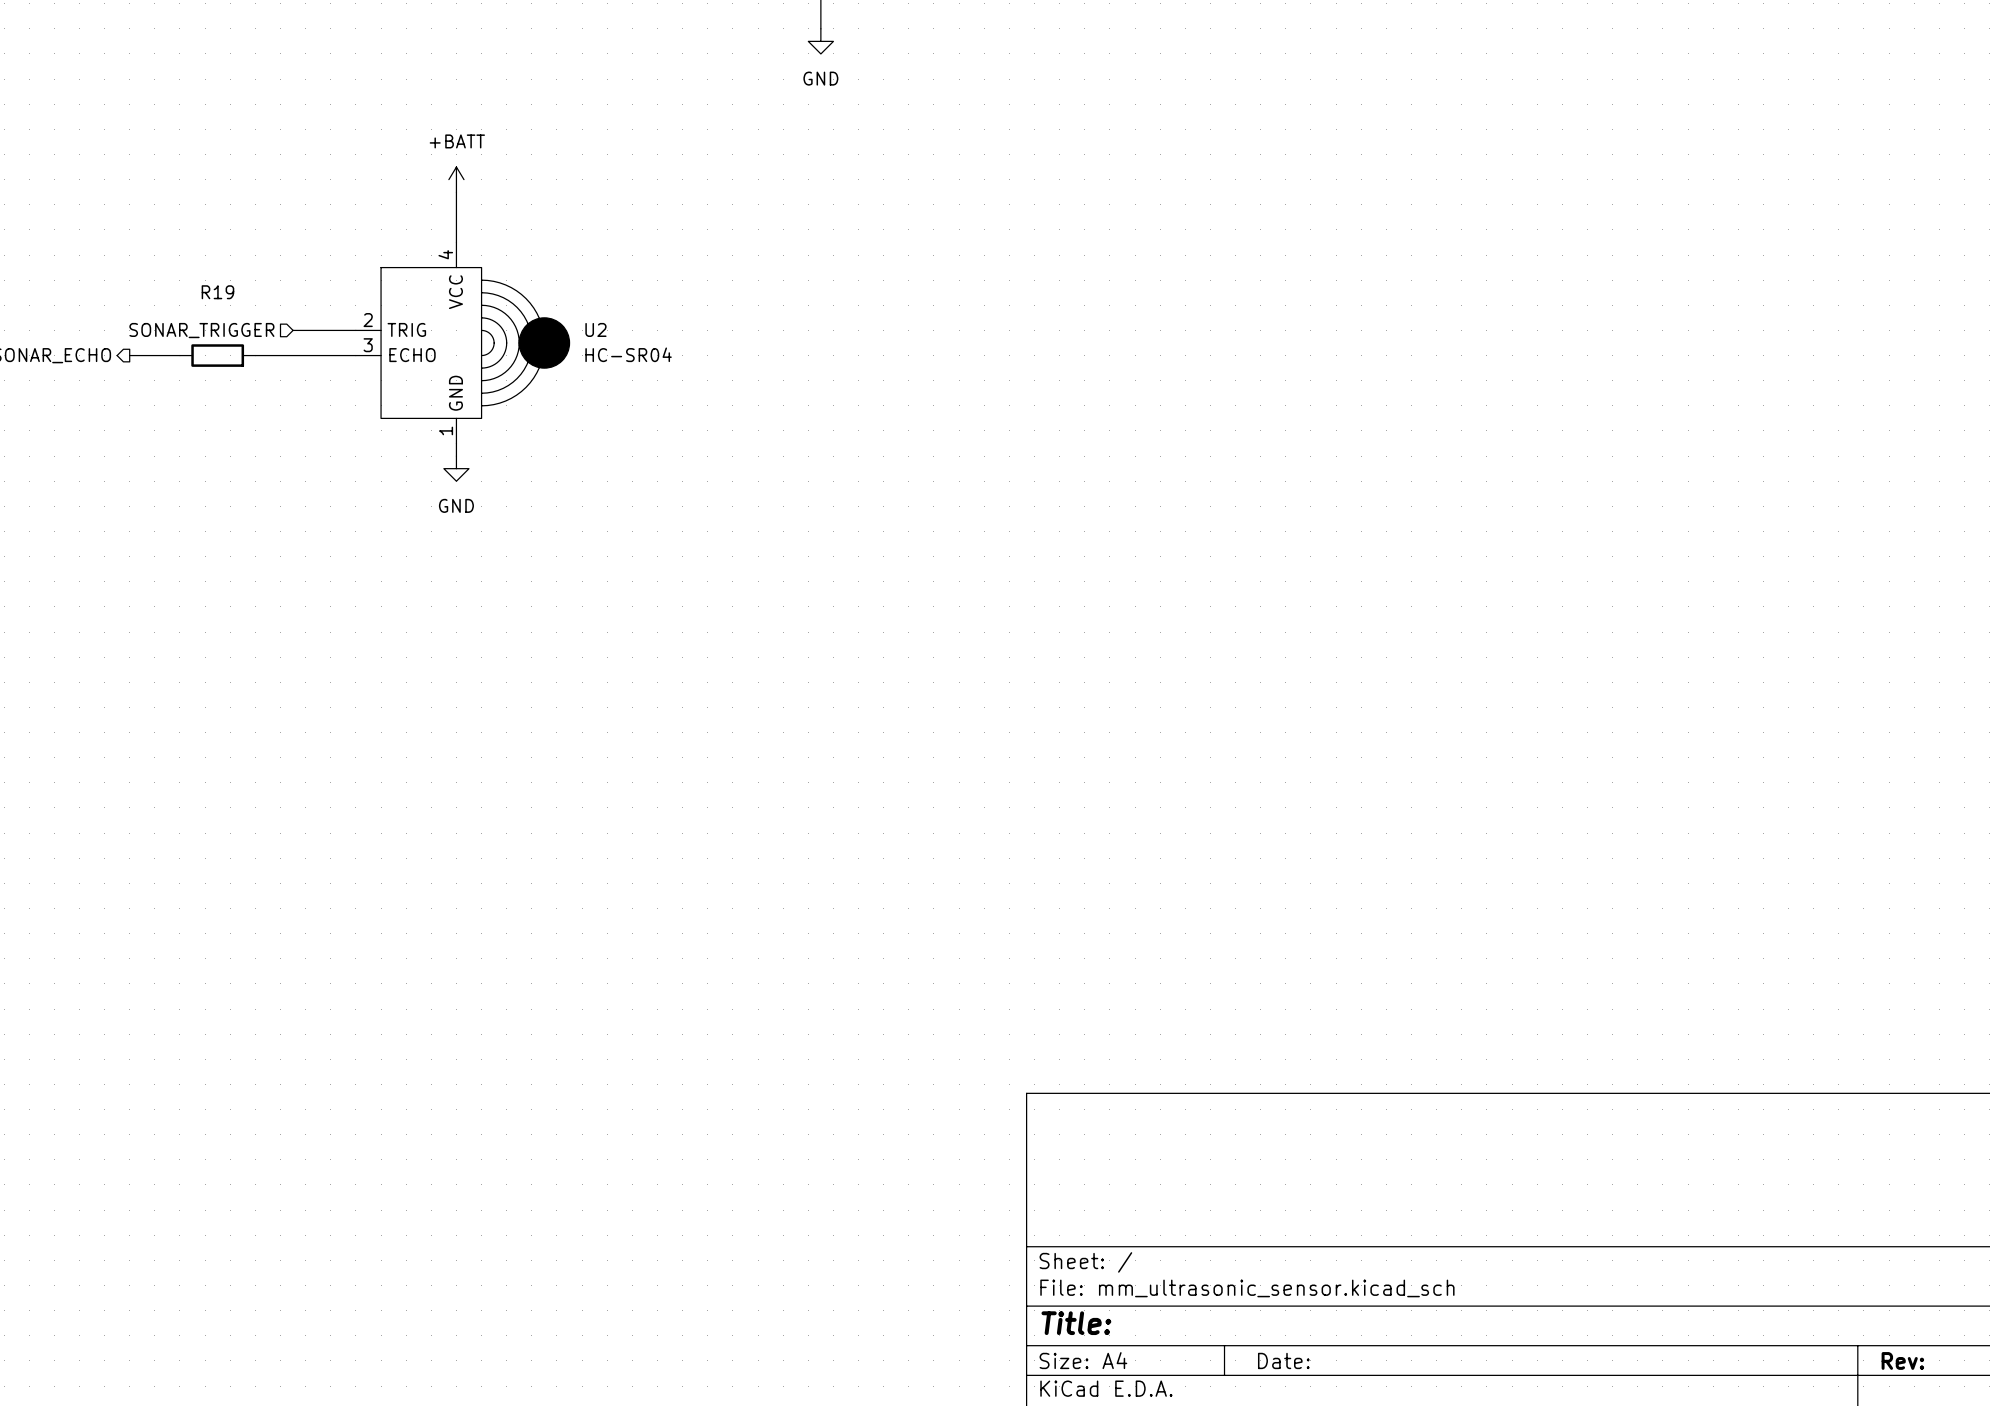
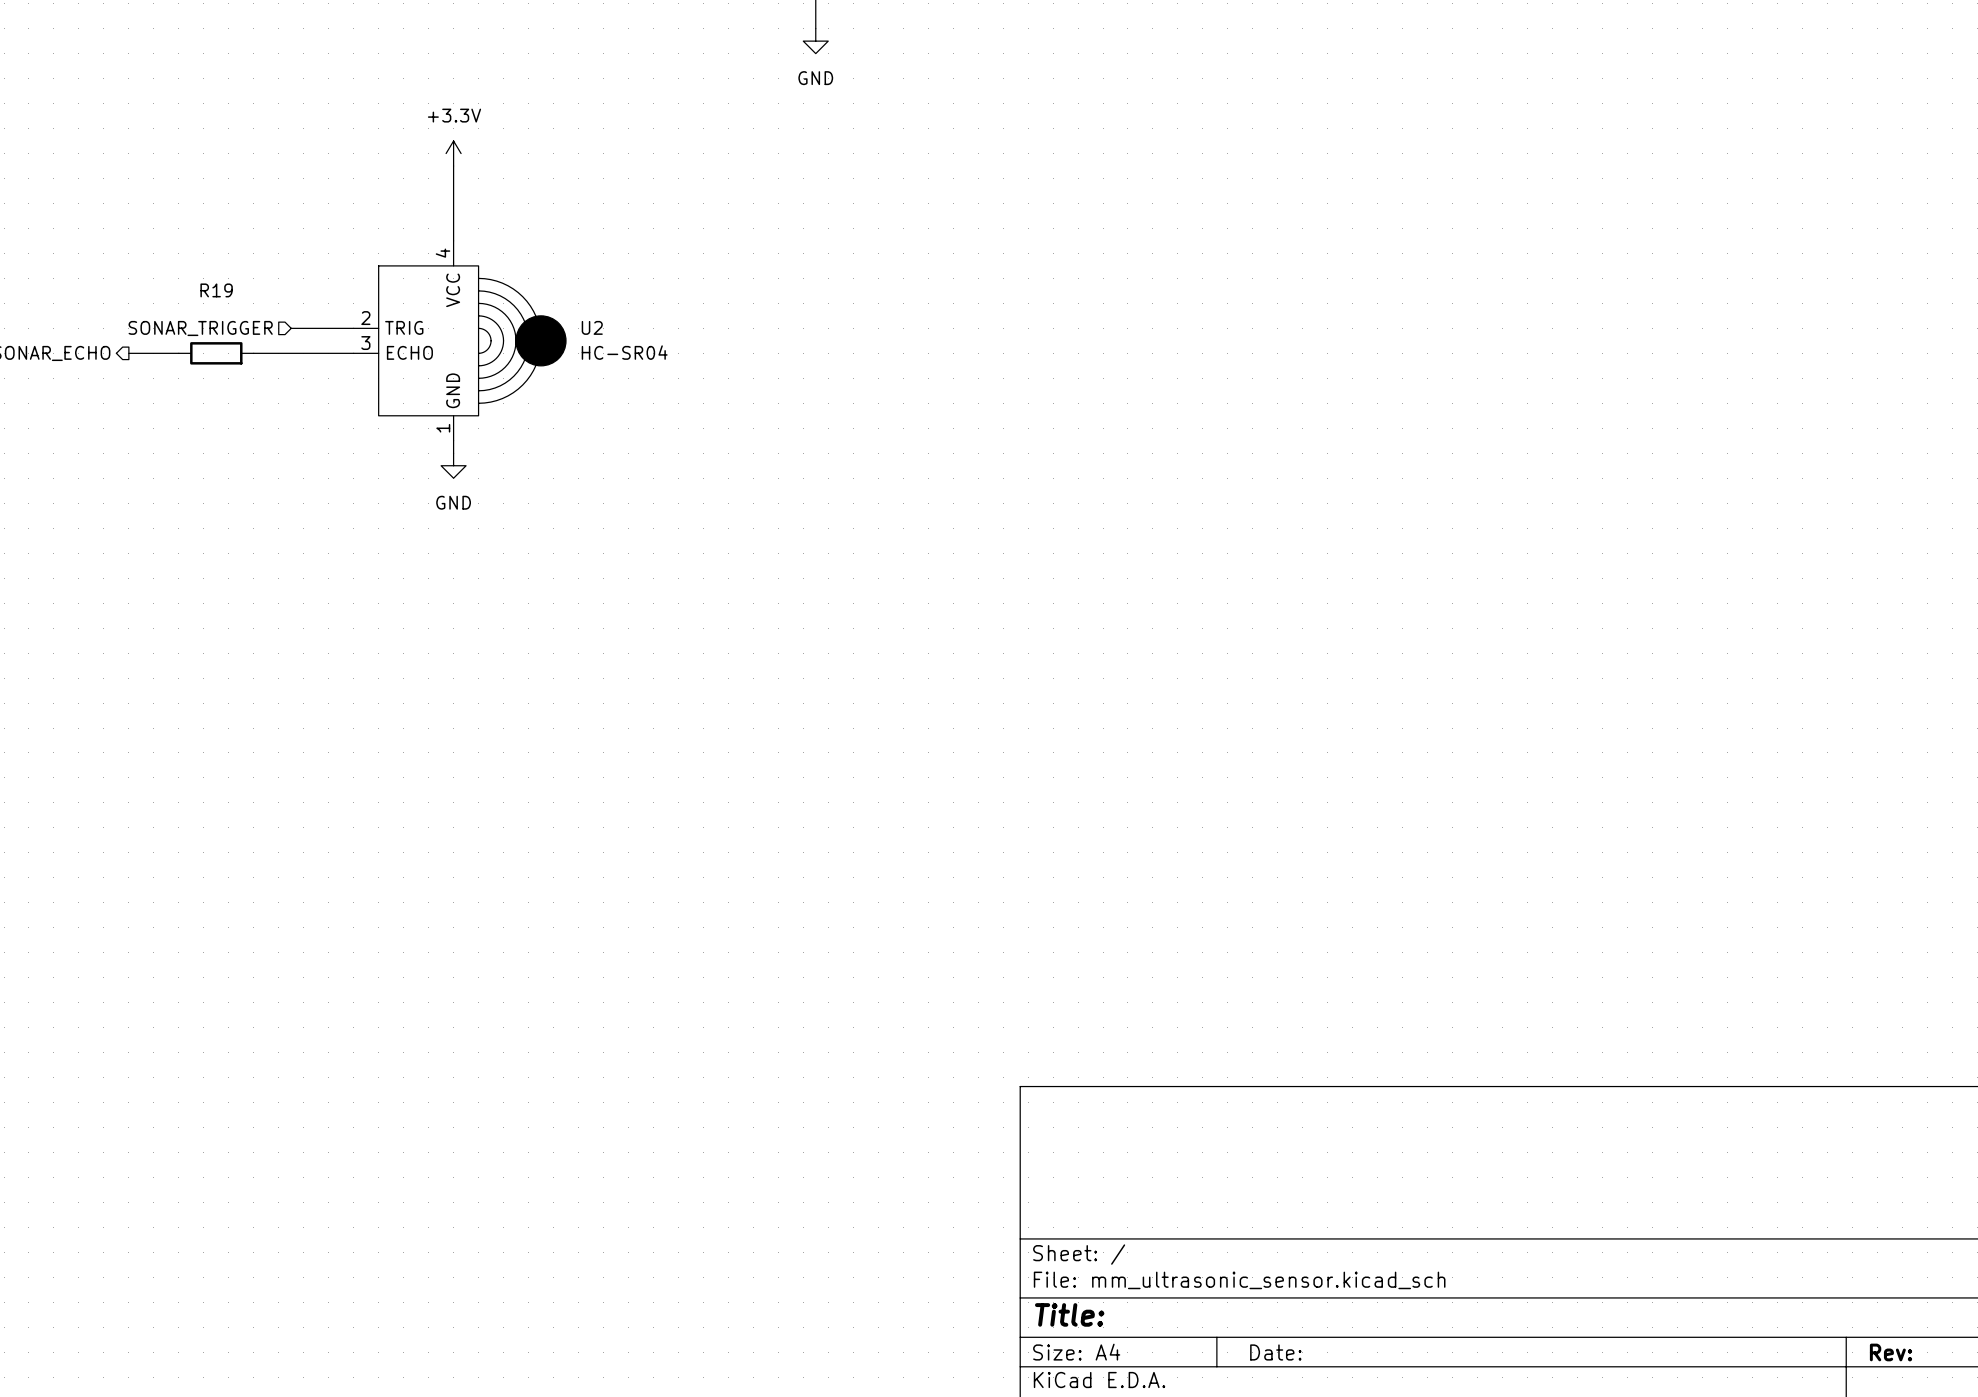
power symbol: none -> +3.3V (453, 153)
power symbol: +BATT (456, 179) -> none

